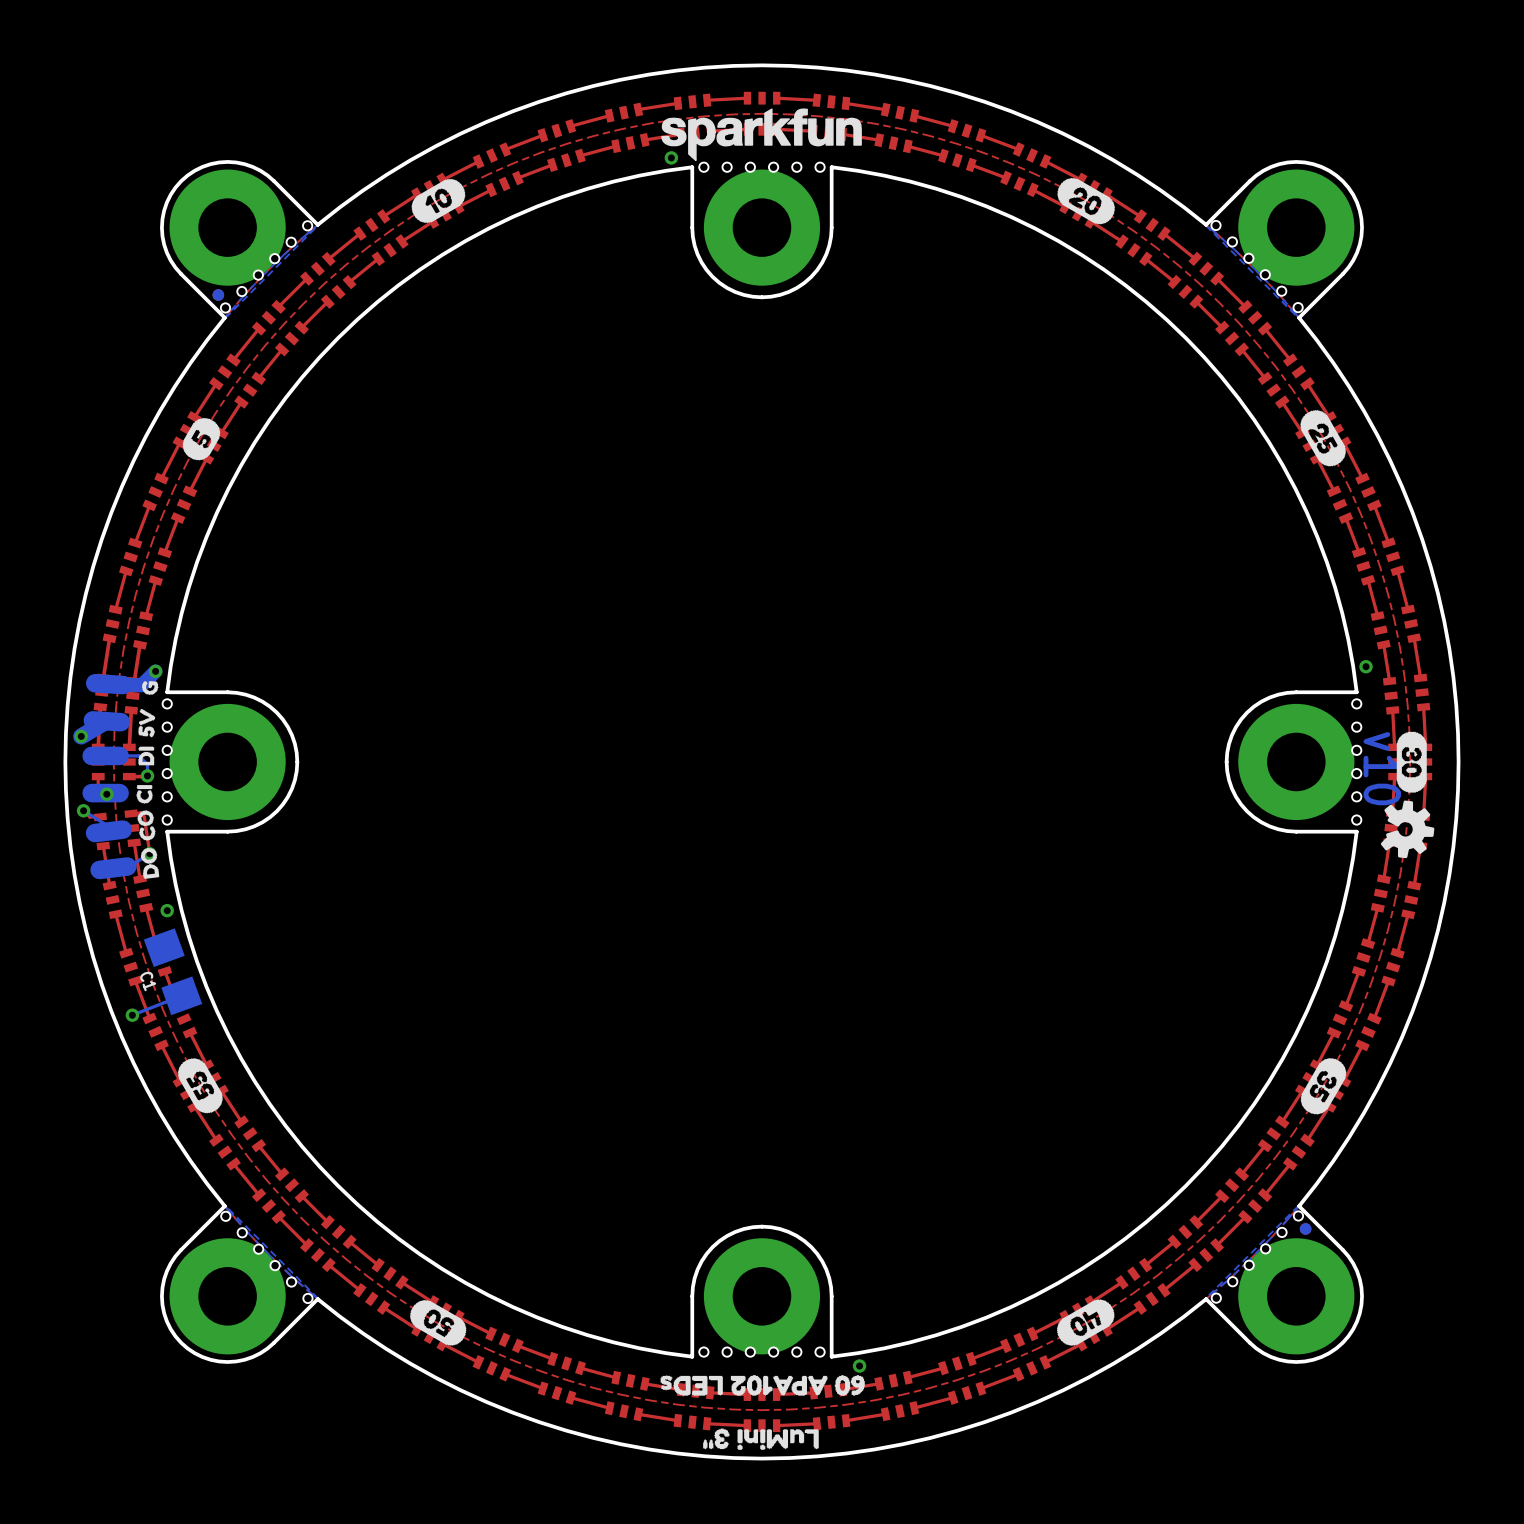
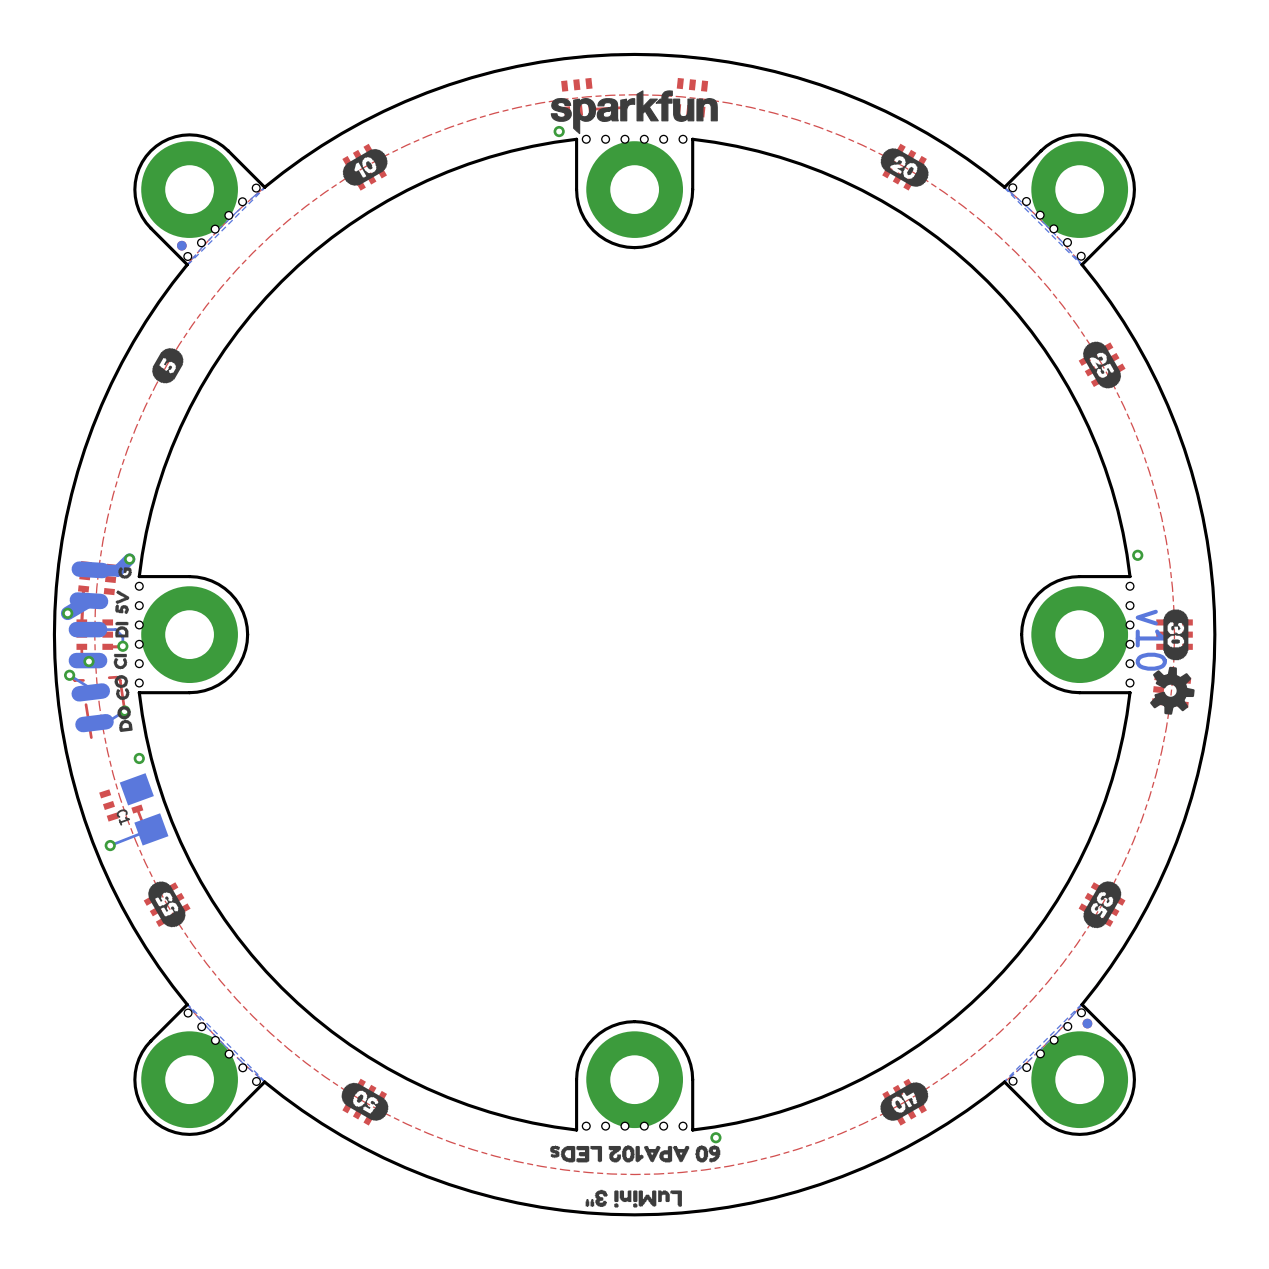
top track: (747, 98) (707, 100) -> none
top track: (776, 98) (816, 100) -> none
top track: (678, 103) (638, 109) -> none
top track: (845, 103) (885, 109) -> none
part: (762, 113) -> none
top track: (609, 115) (570, 126) -> none
top track: (914, 115) (953, 126) -> none
part: (627, 127) -> none
part: (896, 128) -> none
top track: (776, 129) (813, 131) -> none
top track: (681, 134) (644, 140) -> none
top track: (842, 134) (879, 140) -> none
top track: (542, 135) (505, 149) -> none
top track: (980, 135) (1018, 149) -> none
part: (561, 145) -> none
part: (962, 145) -> none
top track: (616, 146) (580, 155) -> none
top track: (907, 146) (943, 155) -> none
top track: (478, 161) (442, 179) -> none
top track: (1045, 161) (1081, 179) -> none
top track: (552, 164) (517, 178) -> none
top track: (971, 164) (1006, 177) -> none
part: (498, 169) -> none
part: (1025, 169) -> none
top track: (491, 189) (458, 206) -> none
top track: (1032, 189) (1065, 206) -> none
top track: (417, 194) (383, 216) -> none
top track: (1106, 194) (1140, 216) -> none
top track: (432, 221) (401, 241) -> none
top track: (1090, 221) (1122, 241) -> none
top track: (360, 233) (328, 259) -> none
top track: (1164, 233) (1195, 258) -> none
part: (381, 237) -> none
part: (1143, 237) -> none
top track: (378, 258) (349, 282) -> none
top track: (1145, 258) (1174, 282) -> none
top track: (306, 278) (278, 306) -> none
top track: (1217, 278) (1245, 306) -> none
part: (328, 280) -> none
part: (1195, 280) -> none
top track: (327, 301) (301, 327) -> none
top track: (1196, 301) (1222, 327) -> none
top track: (259, 328) (233, 360) -> none
part: (280, 328) -> none
part: (1243, 328) -> none
top track: (1264, 328) (1290, 360) -> none
top track: (282, 349) (258, 378) -> none
top track: (1241, 349) (1265, 378) -> none
part: (237, 381) -> none
part: (1286, 381) -> none
top track: (216, 383) (194, 417) -> none
top track: (1307, 383) (1329, 417) -> none
top track: (241, 402) (221, 432) -> none
top track: (1282, 402) (1302, 432) -> none
part: (200, 437) -> none
top track: (179, 442) (161, 478) -> none
top track: (1344, 442) (1362, 478) -> none
top track: (206, 458) (189, 491) -> none
top track: (1317, 458) (1334, 491) -> none
part: (169, 498) -> none
part: (1354, 498) -> none
top track: (149, 505) (135, 543) -> none
top track: (1374, 505) (1388, 542) -> none
top track: (178, 518) (164, 552) -> none
top track: (1345, 518) (1359, 552) -> none
part: (145, 561) -> none
part: (1378, 561) -> none
top track: (126, 570) (115, 609) -> none
top track: (1397, 570) (1408, 609) -> none
top track: (155, 580) (146, 616) -> none
top track: (1368, 580) (1377, 616) -> none
part: (127, 627) -> none
part: (1395, 627) -> none
top track: (109, 638) (103, 677) -> none
top track: (1414, 638) (1420, 678) -> none
top track: (140, 644) (134, 681) -> none
top track: (1383, 644) (1389, 681) -> none
part: (1406, 694) -> none
top track: (1423, 707) (1425, 747) -> none
top track: (131, 710) (129, 747) -> none
top track: (1392, 710) (1394, 747) -> none
top track: (1394, 776) (1392, 813) -> none
top track: (1425, 776) (1423, 816) -> none
part: (117, 829) -> none
top track: (134, 842) (140, 879) -> none
top track: (1389, 842) (1383, 879) -> none
top track: (1420, 845) (1414, 885) -> none
part: (127, 896) -> none
part: (1396, 896) -> none
top track: (146, 907) (155, 943) -> none
top track: (1377, 907) (1368, 943) -> none
top track: (115, 914) (126, 953) -> none
top track: (1408, 914) (1397, 953) -> none
part: (1378, 962) -> none
top track: (1358, 971) (1345, 1006) -> none
top track: (135, 981) (149, 1018) -> none
top track: (1388, 981) (1374, 1018) -> none
part: (169, 1025) -> none
part: (1354, 1025) -> none
top track: (190, 1032) (206, 1065) -> none
top track: (1334, 1032) (1317, 1065) -> none
top track: (161, 1045) (179, 1081) -> none
top track: (1362, 1045) (1343, 1081) -> none
top track: (1302, 1090) (1282, 1122) -> none
top track: (221, 1091) (241, 1121) -> none
top track: (194, 1106) (216, 1140) -> none
top track: (1329, 1106) (1307, 1140) -> none
part: (237, 1142) -> none
part: (1286, 1142) -> none
top track: (258, 1145) (282, 1174) -> none
top track: (1265, 1145) (1241, 1174) -> none
top track: (233, 1163) (259, 1195) -> none
top track: (1290, 1163) (1264, 1195) -> none
part: (280, 1195) -> none
part: (1243, 1195) -> none
top track: (301, 1196) (327, 1222) -> none
top track: (1222, 1196) (1196, 1222) -> none
top track: (278, 1216) (307, 1245) -> none
top track: (1245, 1216) (1217, 1245) -> none
top track: (349, 1241) (378, 1265) -> none
top track: (1174, 1241) (1145, 1265) -> none
part: (328, 1243) -> none
part: (1195, 1243) -> none
top track: (328, 1264) (359, 1290) -> none
top track: (1195, 1264) (1163, 1290) -> none
top track: (401, 1282) (432, 1302) -> none
top track: (1122, 1282) (1091, 1302) -> none
part: (380, 1286) -> none
part: (1142, 1286) -> none
top track: (383, 1307) (417, 1329) -> none
top track: (1140, 1307) (1106, 1329) -> none
top track: (458, 1317) (491, 1333) -> none
top track: (1065, 1317) (1032, 1333) -> none
top track: (442, 1344) (478, 1362) -> none
top track: (1081, 1344) (1045, 1362) -> none
top track: (517, 1345) (552, 1359) -> none
top track: (1005, 1345) (971, 1359) -> none
part: (498, 1354) -> none
part: (1025, 1354) -> none
top track: (580, 1368) (616, 1377) -> none
top track: (943, 1368) (907, 1377) -> none
top track: (505, 1374) (543, 1388) -> none
top track: (1018, 1374) (980, 1388) -> none
part: (561, 1378) -> none
part: (962, 1378) -> none
top track: (644, 1383) (681, 1389) -> none
top track: (879, 1383) (842, 1389) -> none
top track: (710, 1392) (747, 1394) -> none
top track: (813, 1392) (776, 1394) -> none
part: (896, 1395) -> none
part: (627, 1396) -> none
top track: (570, 1397) (609, 1408) -> none
top track: (953, 1397) (914, 1408) -> none
part: (694, 1406) -> none
part: (829, 1406) -> none
part: (761, 1410) -> none
top track: (638, 1414) (677, 1420) -> none
top track: (885, 1414) (846, 1420) -> none
top track: (707, 1423) (747, 1425) -> none
top track: (816, 1423) (776, 1425) -> none

